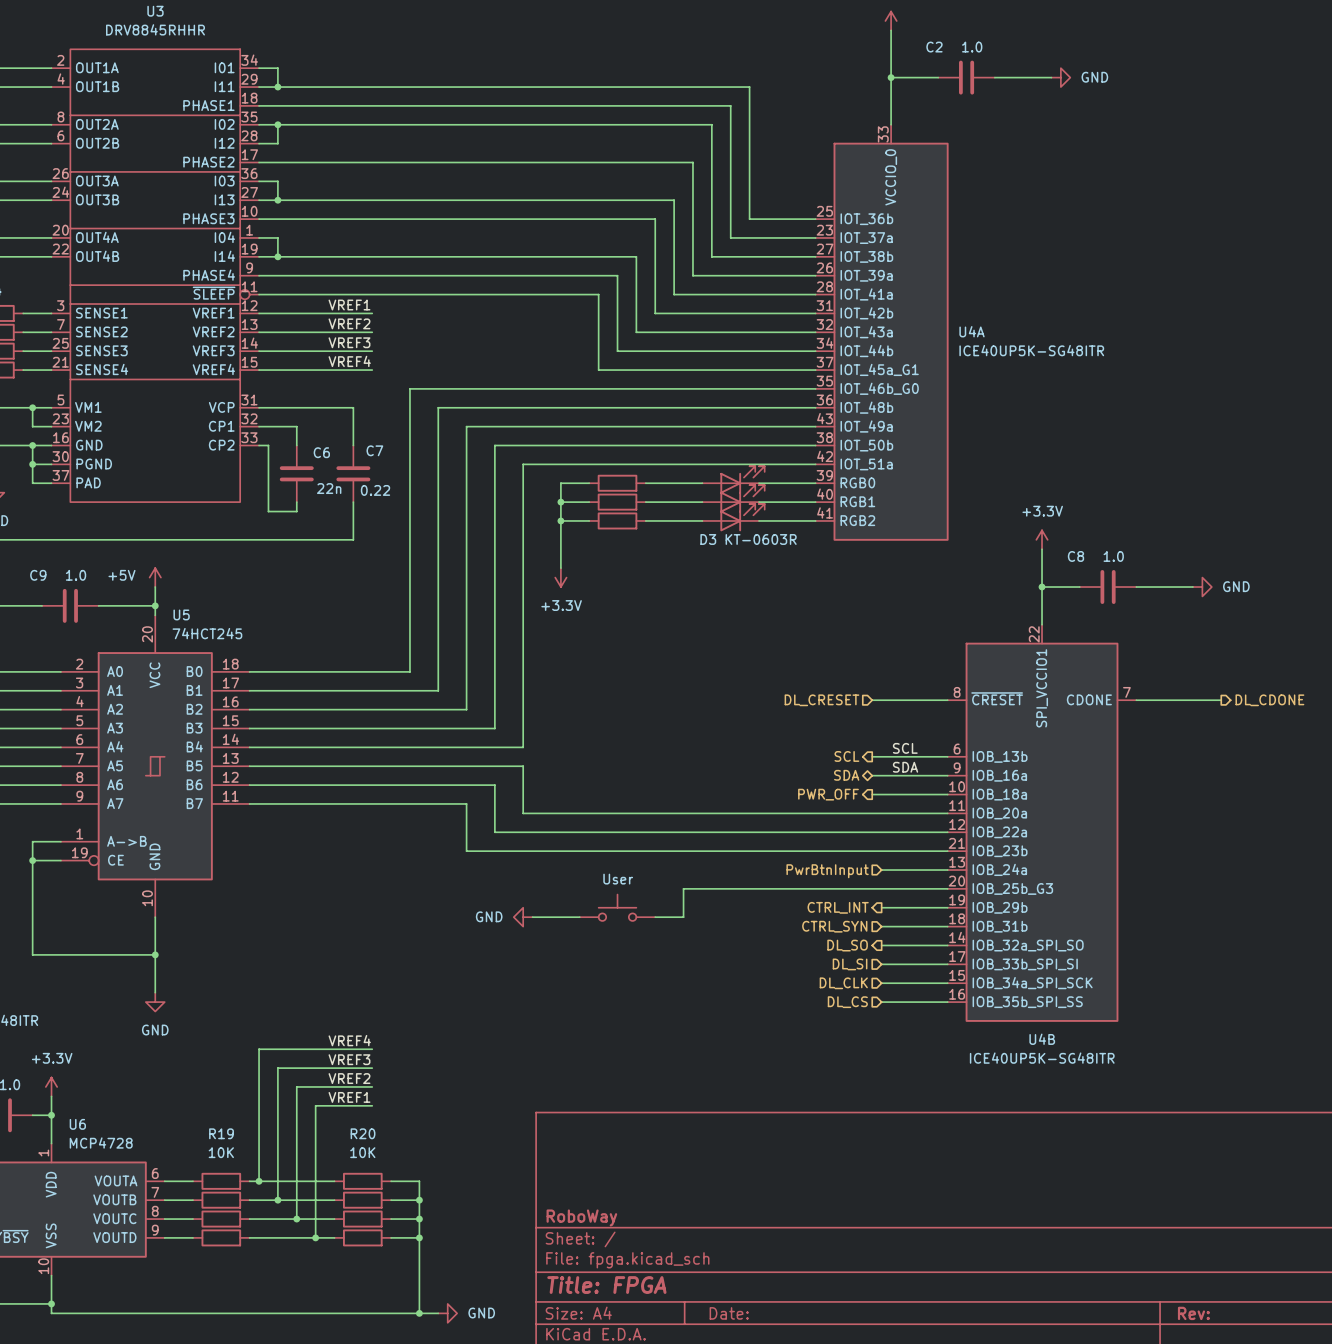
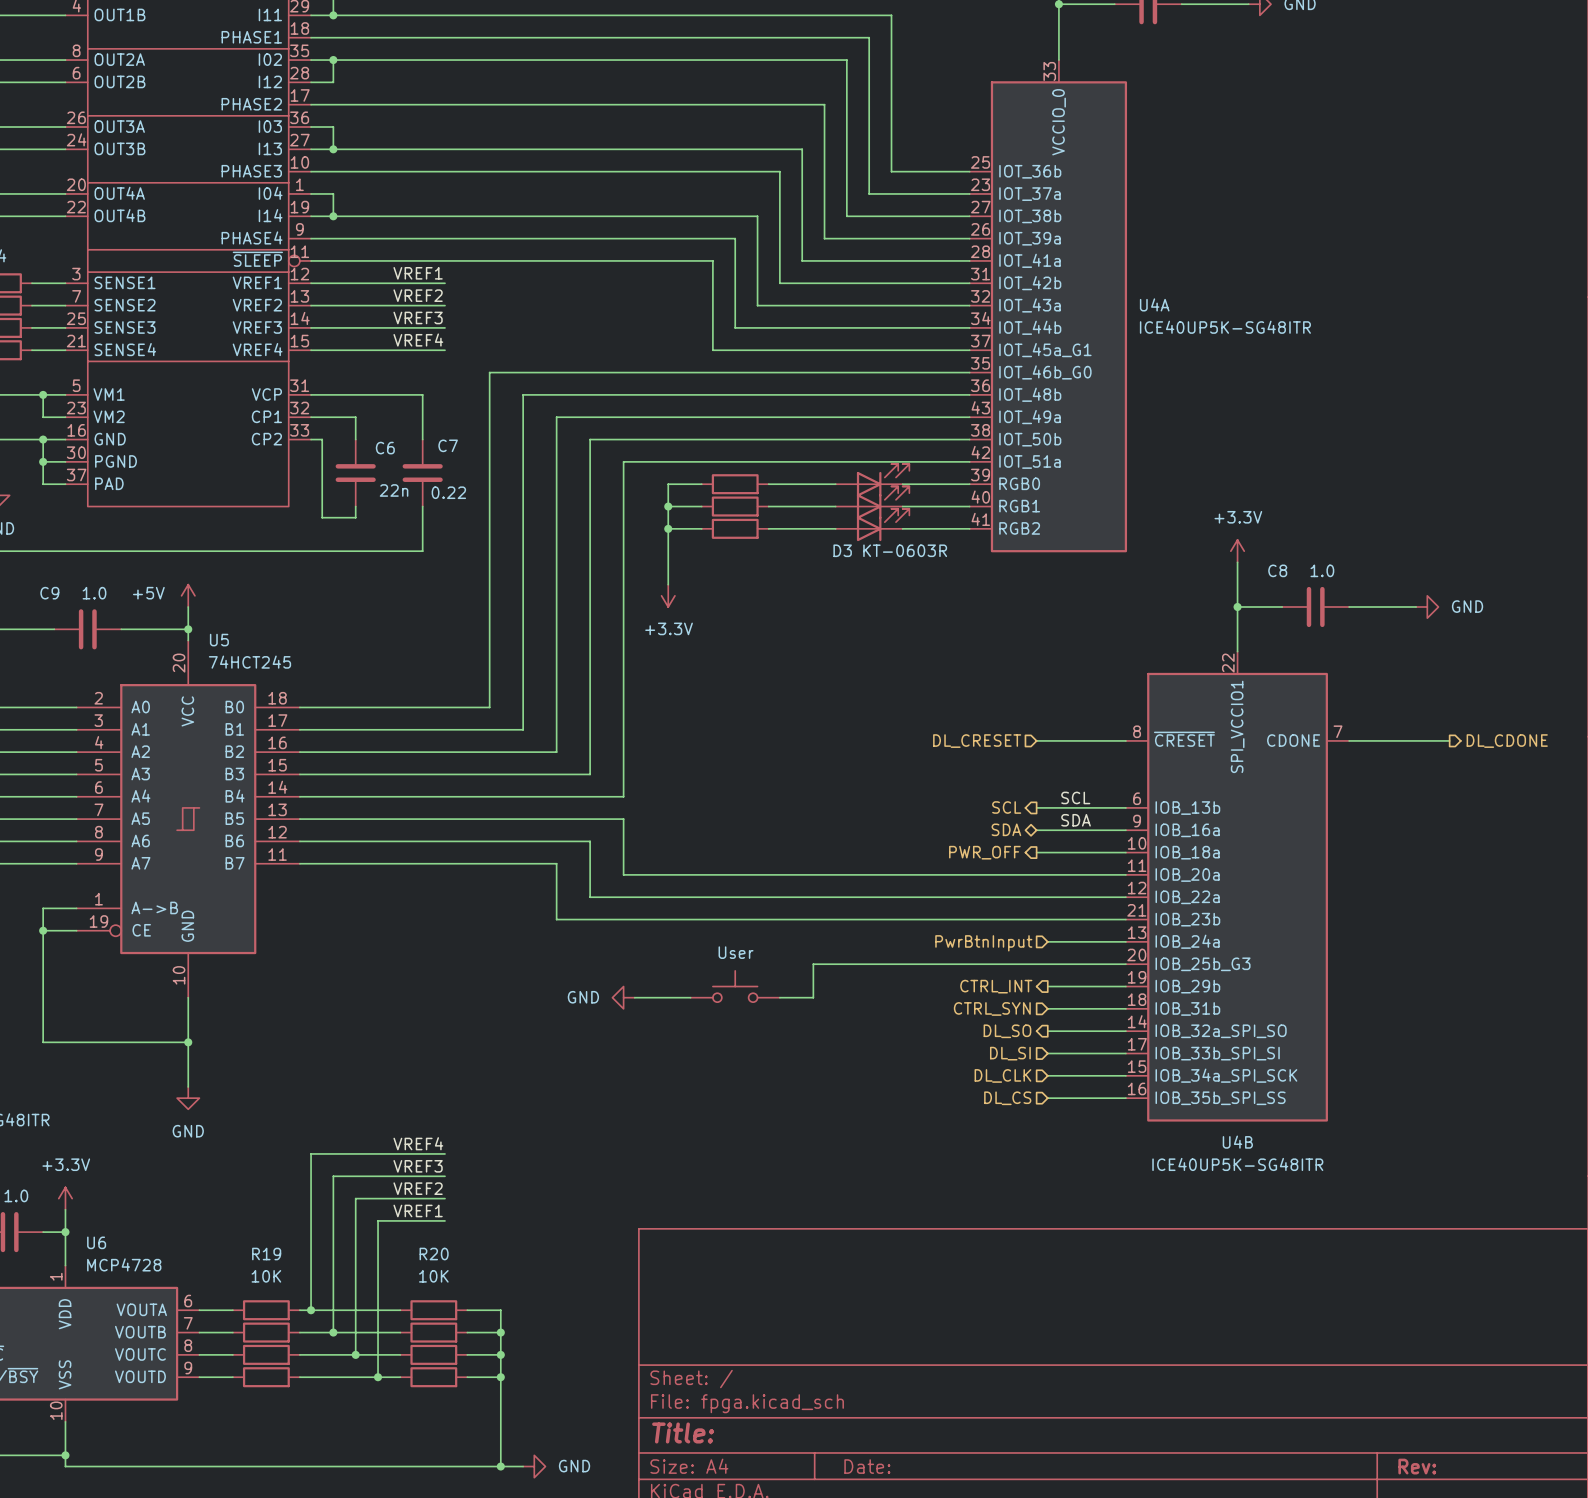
title block: RoboWay (581, 1217) -> none
title block: Title: FPGA (606, 1285) -> Title: (683, 1432)

